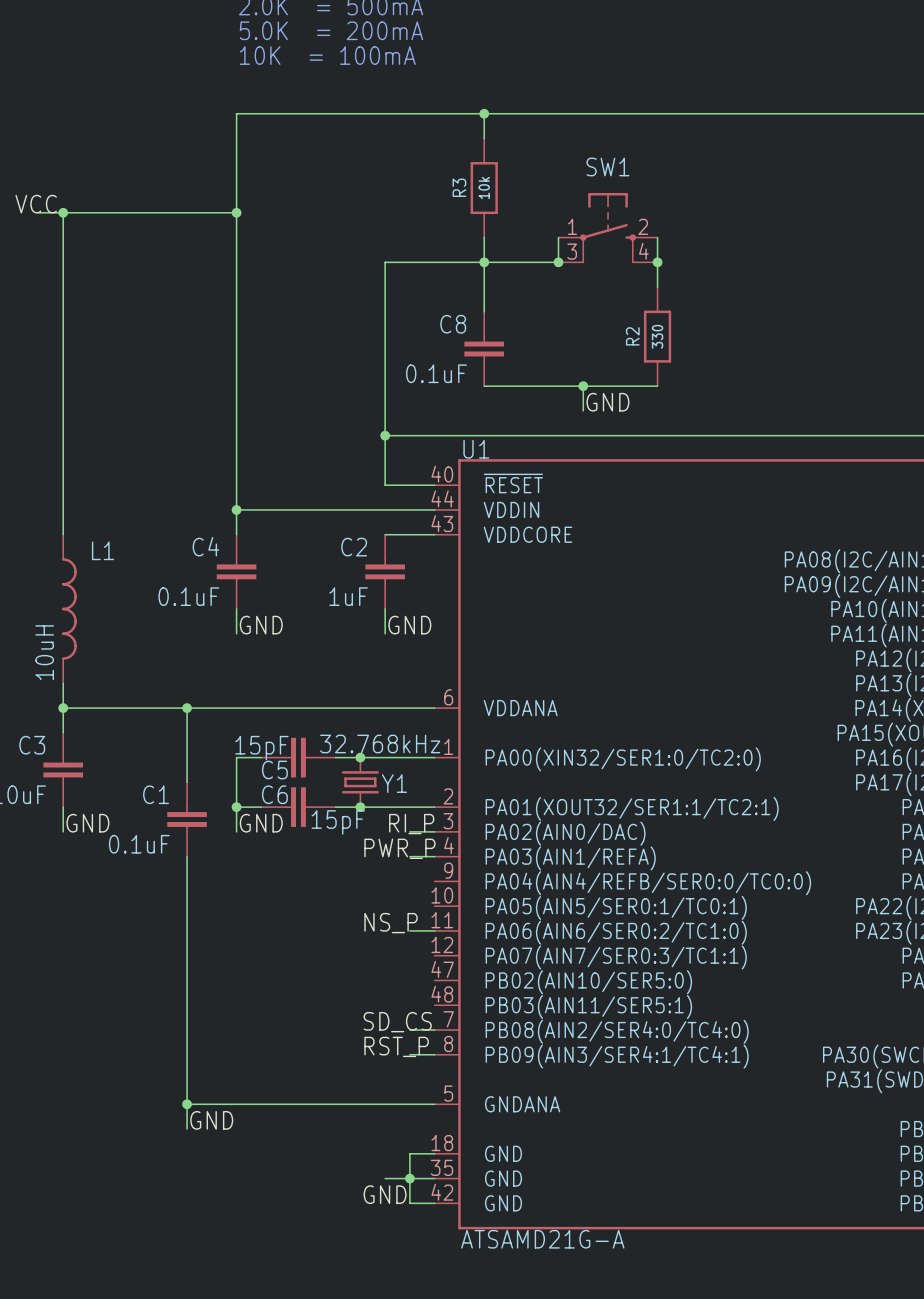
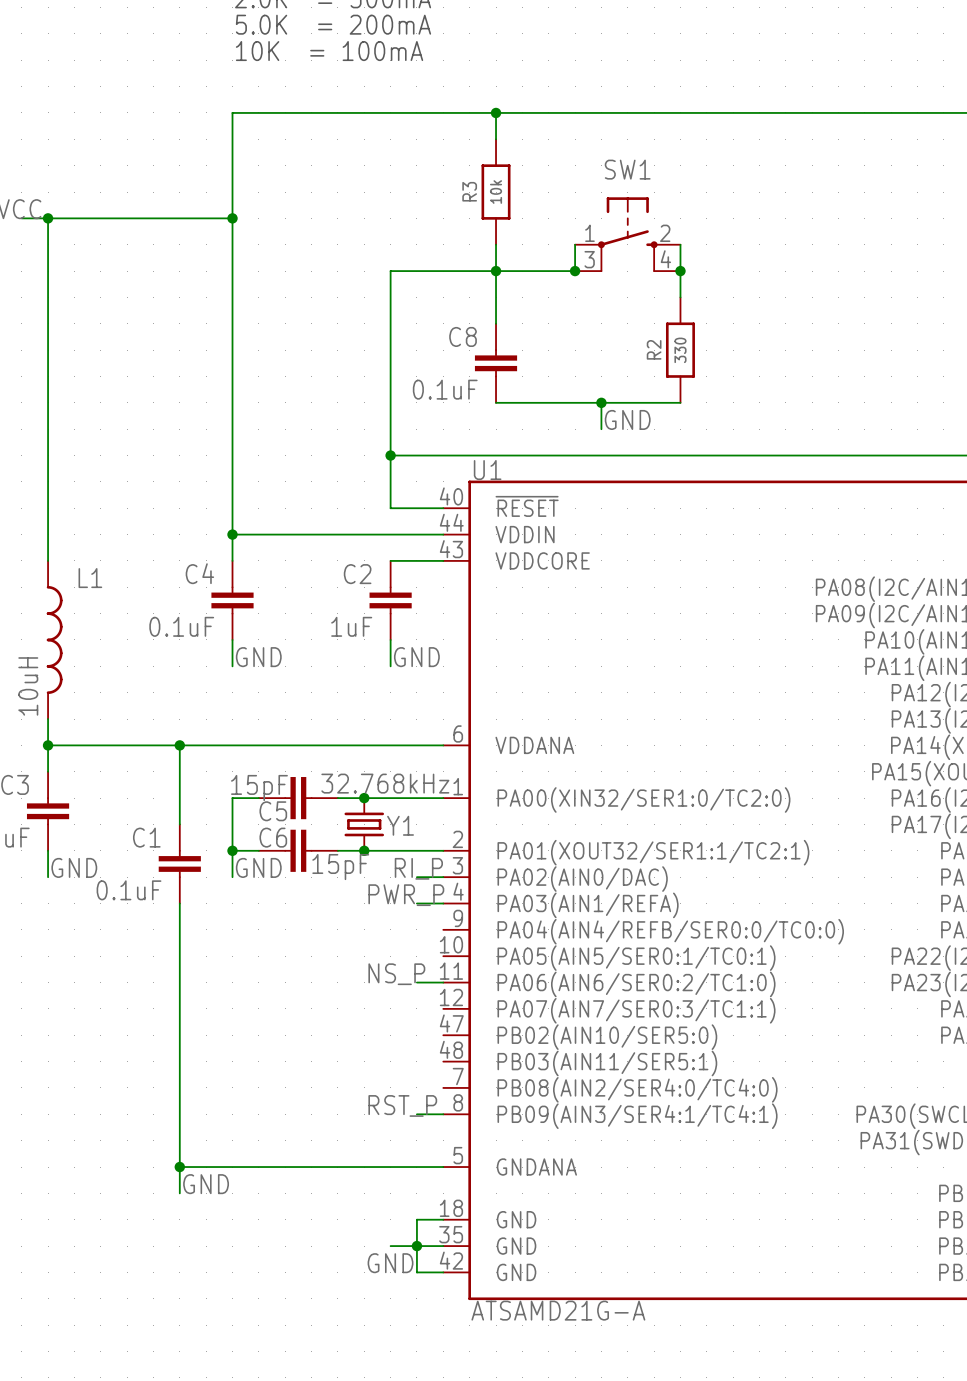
label: SD_CS (397, 1022) -> none
wire: (409, 1030) (434, 1030) -> none

